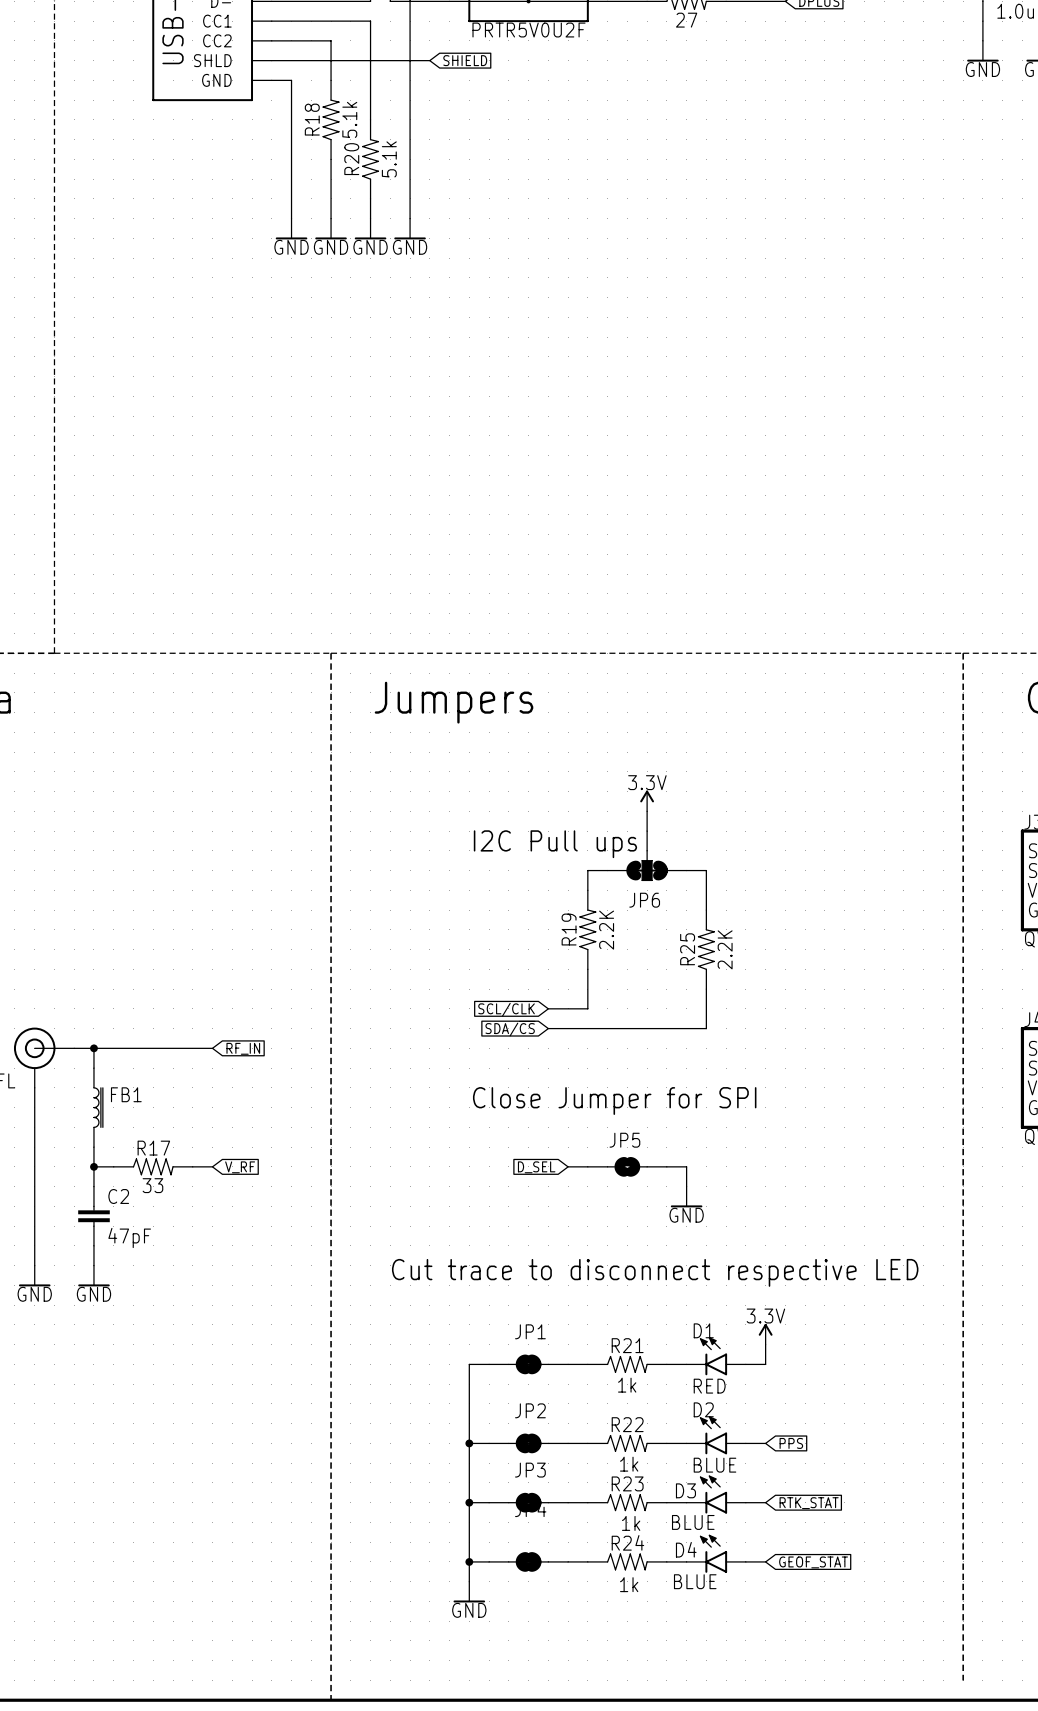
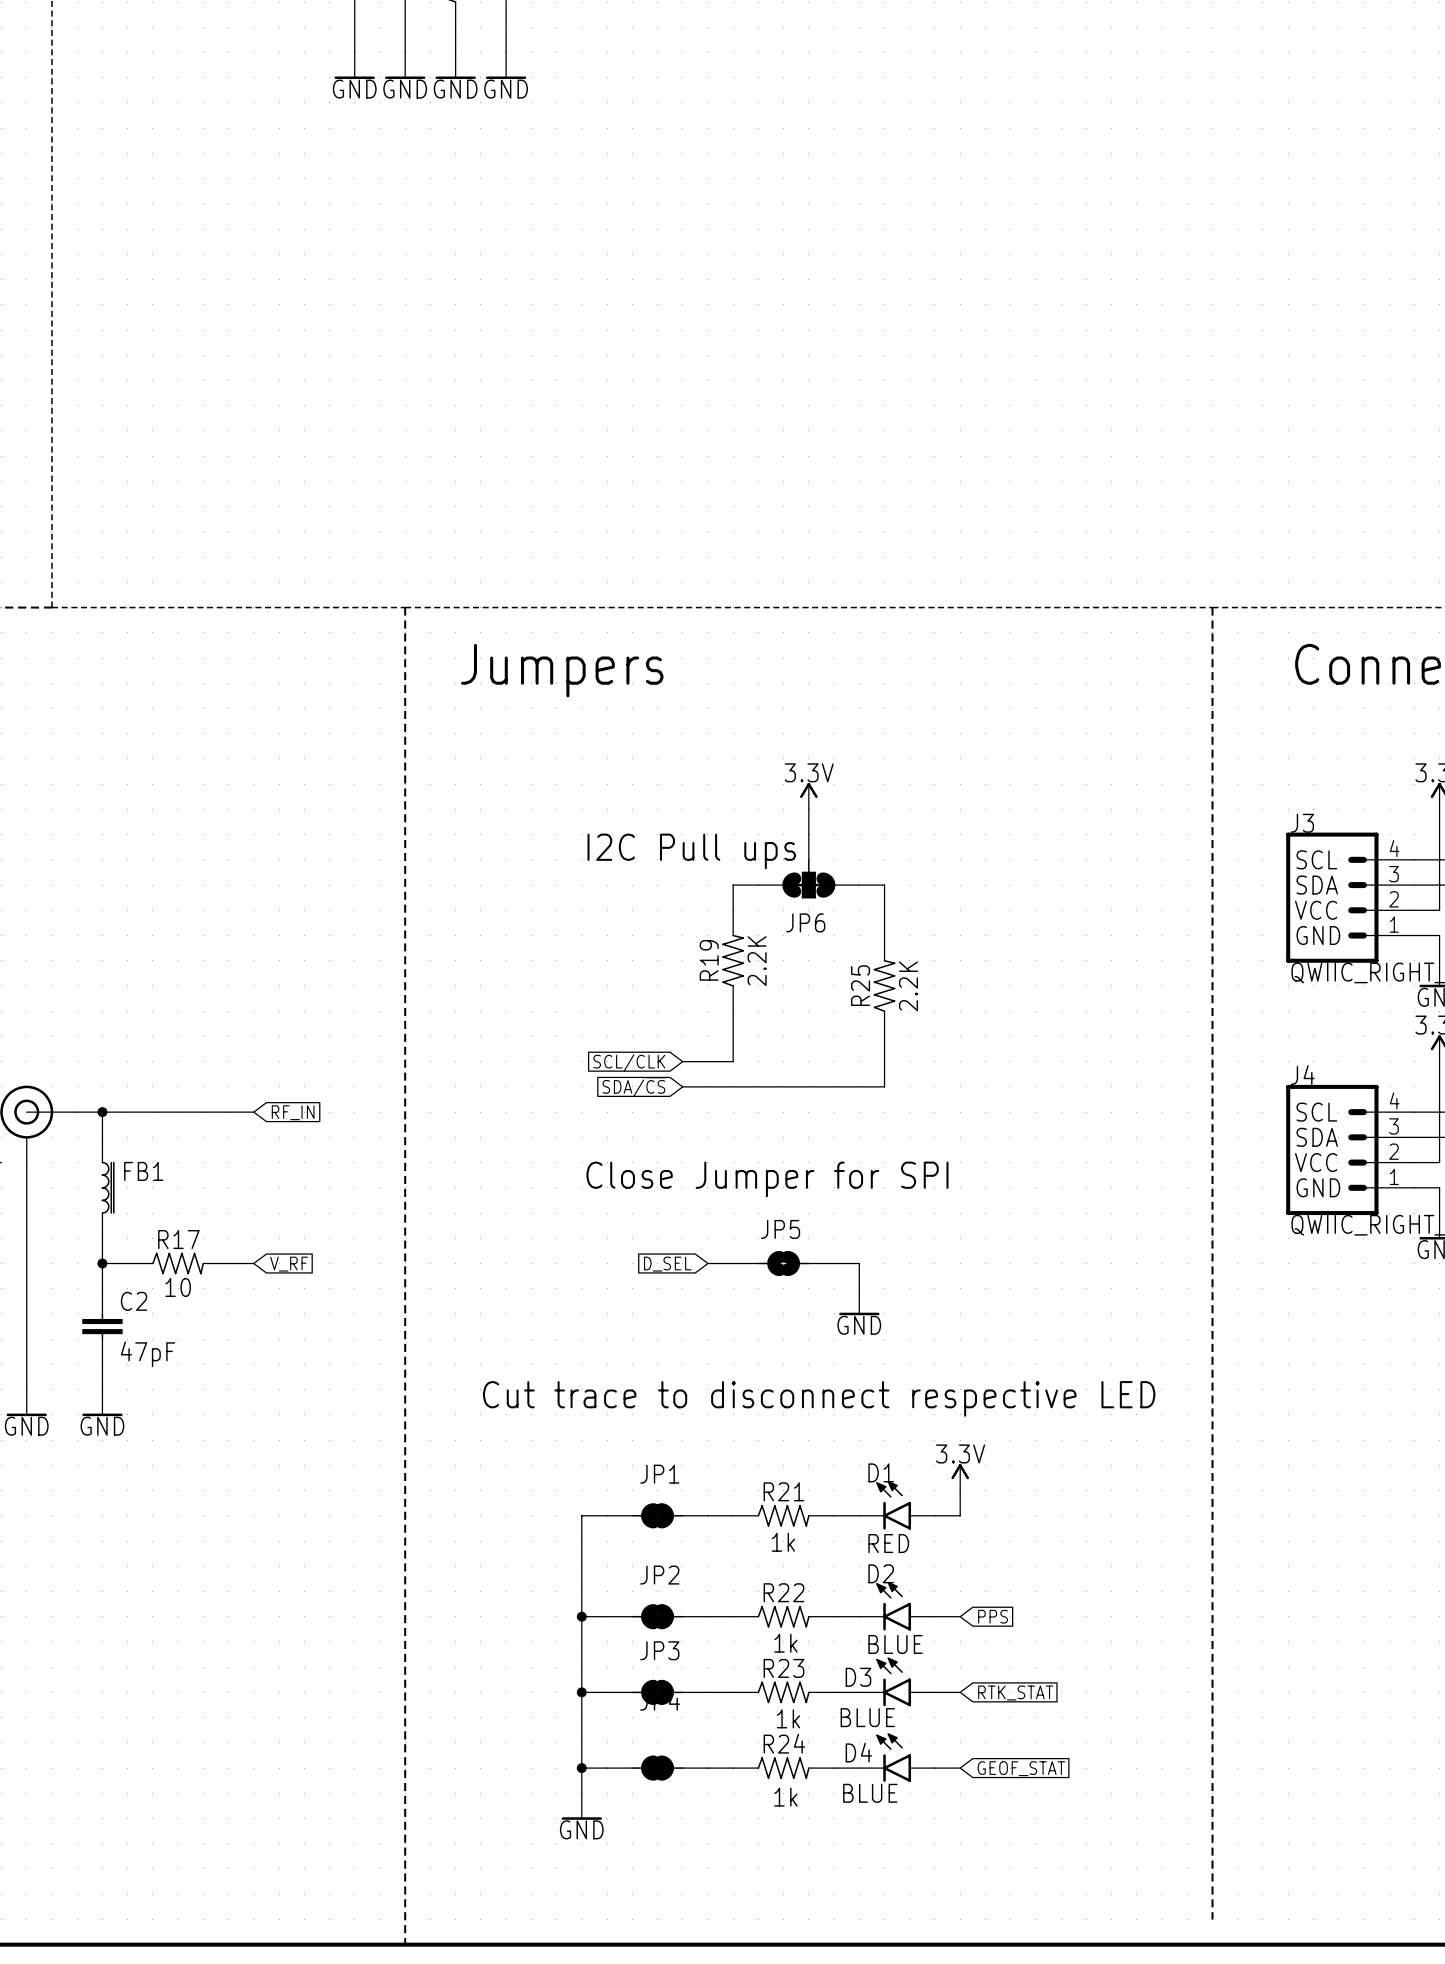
R17 value: 33 (152, 1185) -> 10 (178, 1287)

